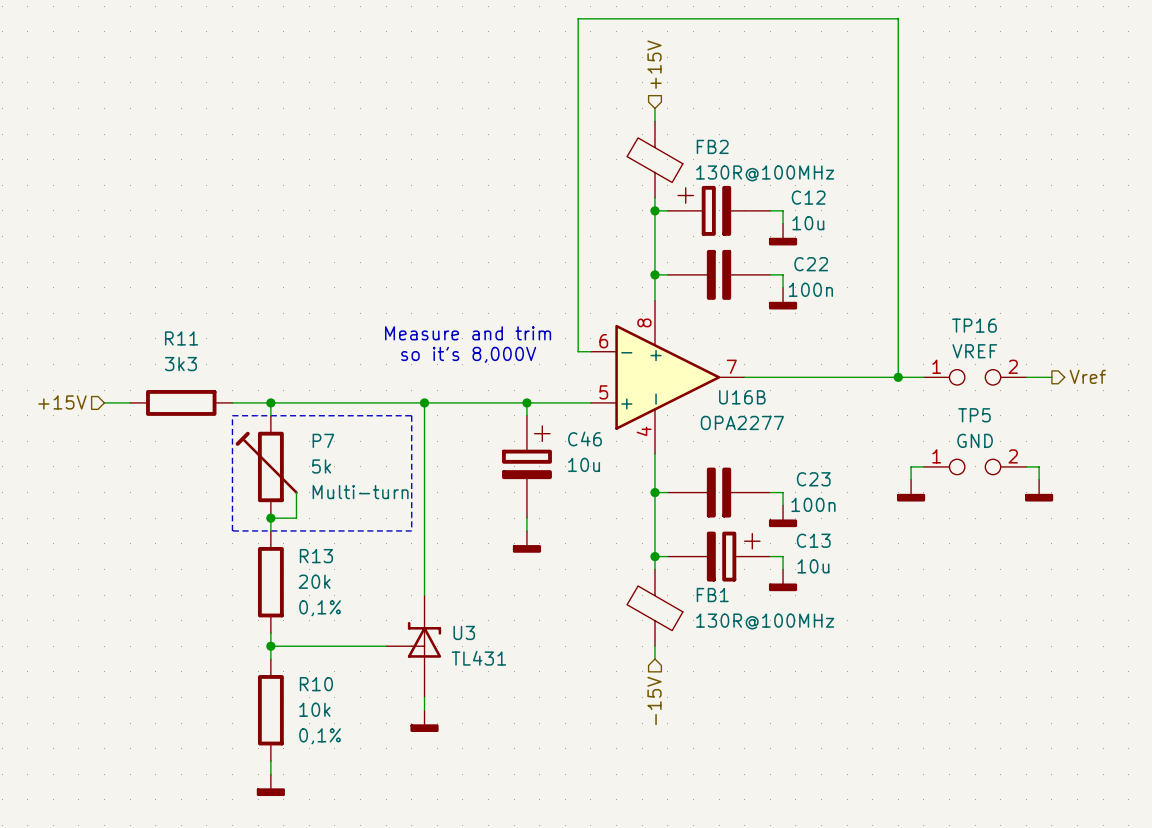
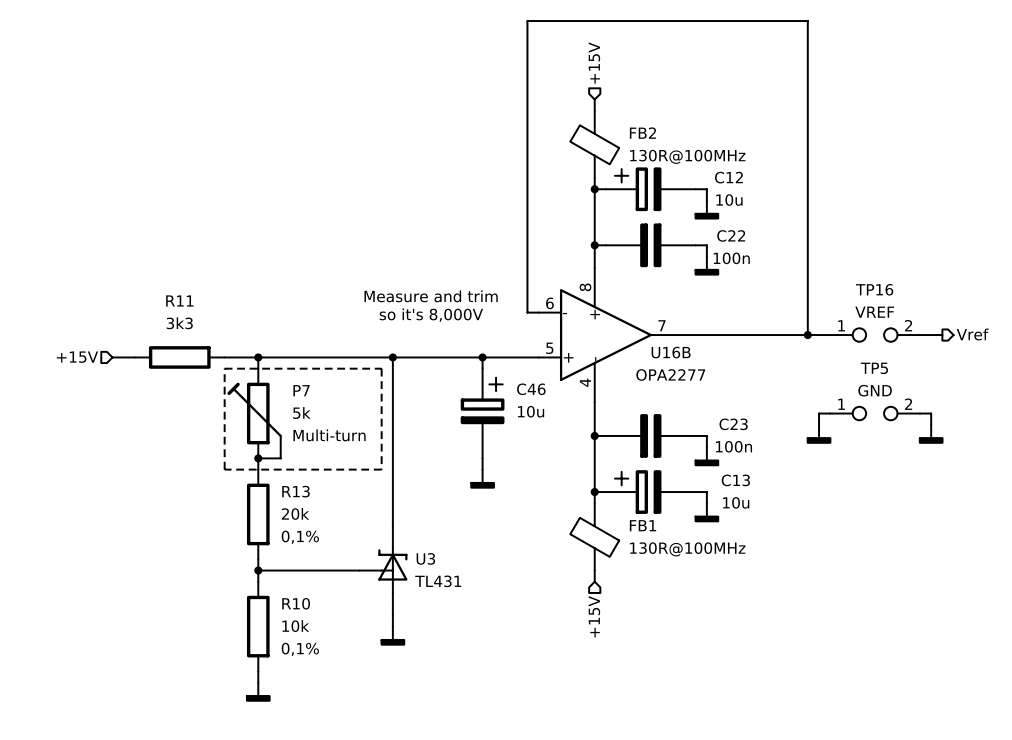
C13 flip: as is (733, 556) -> left-right (638, 492)
hierarchical label: -15V (654, 700) -> +15V (594, 616)

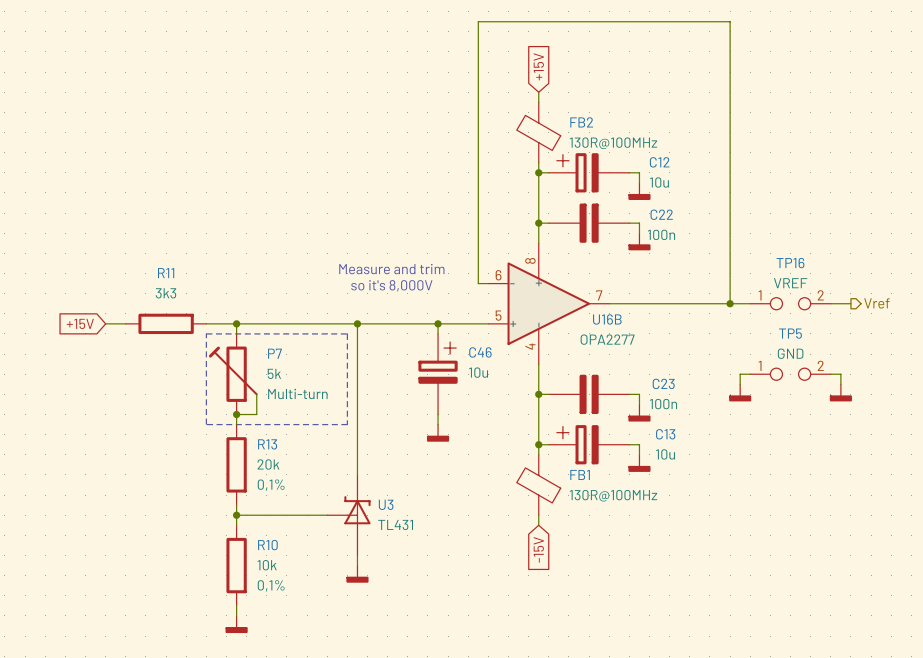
hierarchical label: +15V (594, 63) -> none
global label: none -> +15V (538, 66)
hierarchical label: +15V (77, 357) -> none
global label: none -> +15V (80, 323)
global label: none -> -15V (538, 549)
hierarchical label: +15V (594, 616) -> none

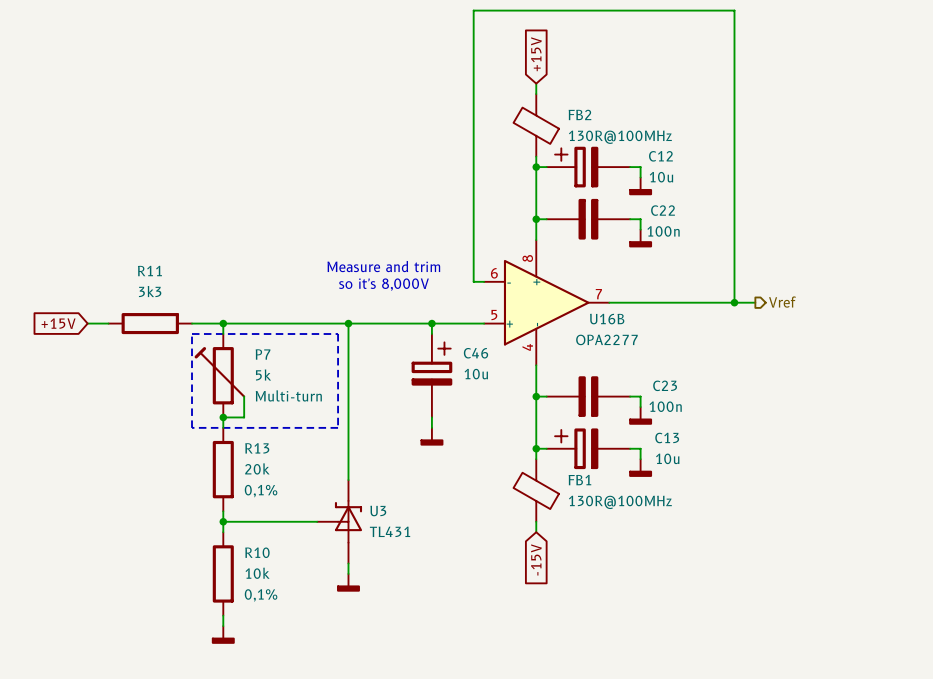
TP16: VREF (790, 303) -> none
wire: (830, 303) (850, 303) -> none
hierarchical label position: Vref (876, 303) -> Vref (782, 302)
wire: (750, 374) (740, 374) (740, 384) -> none
TP5: GND (790, 374) -> none
wire: (830, 374) (840, 374) (840, 384) -> none
power symbol: (740, 392) -> none
power symbol: (840, 392) -> none

